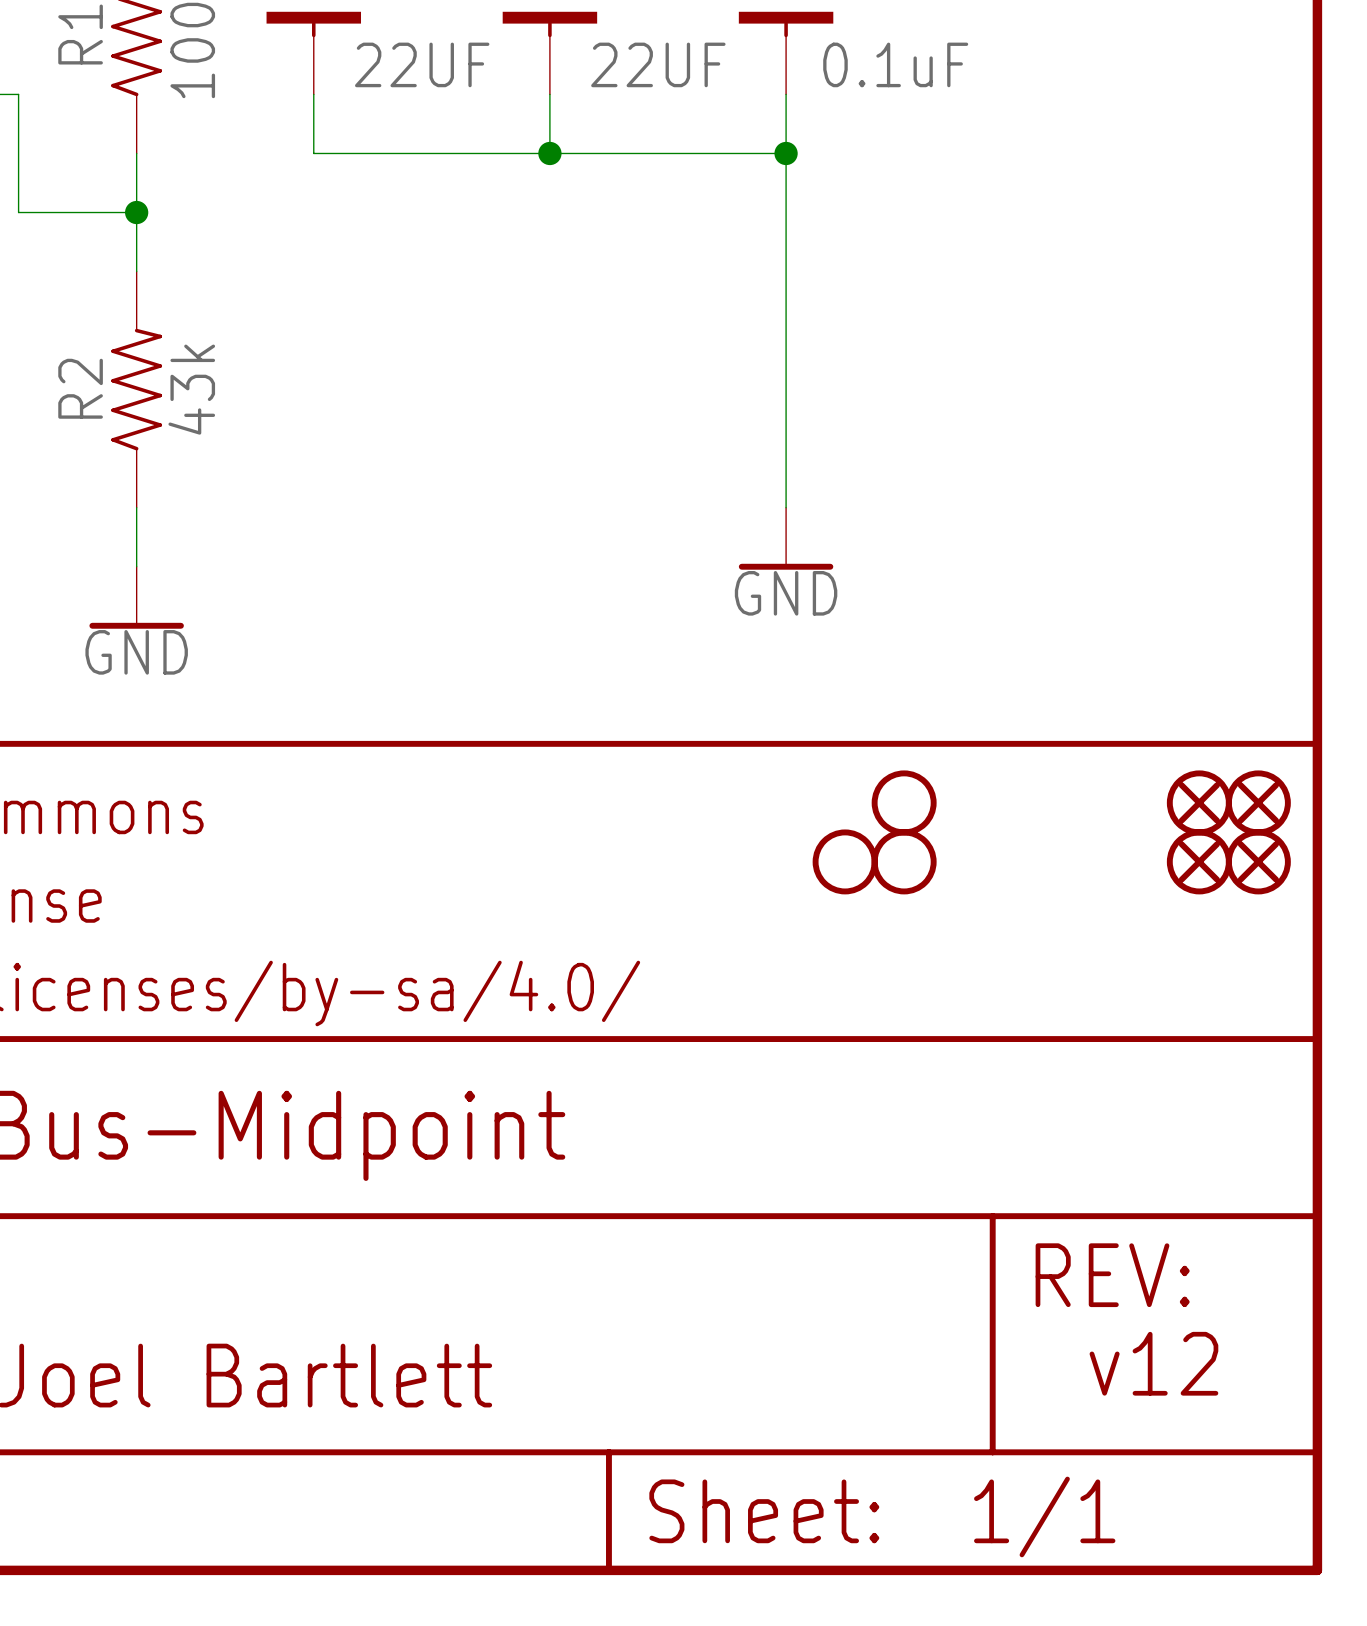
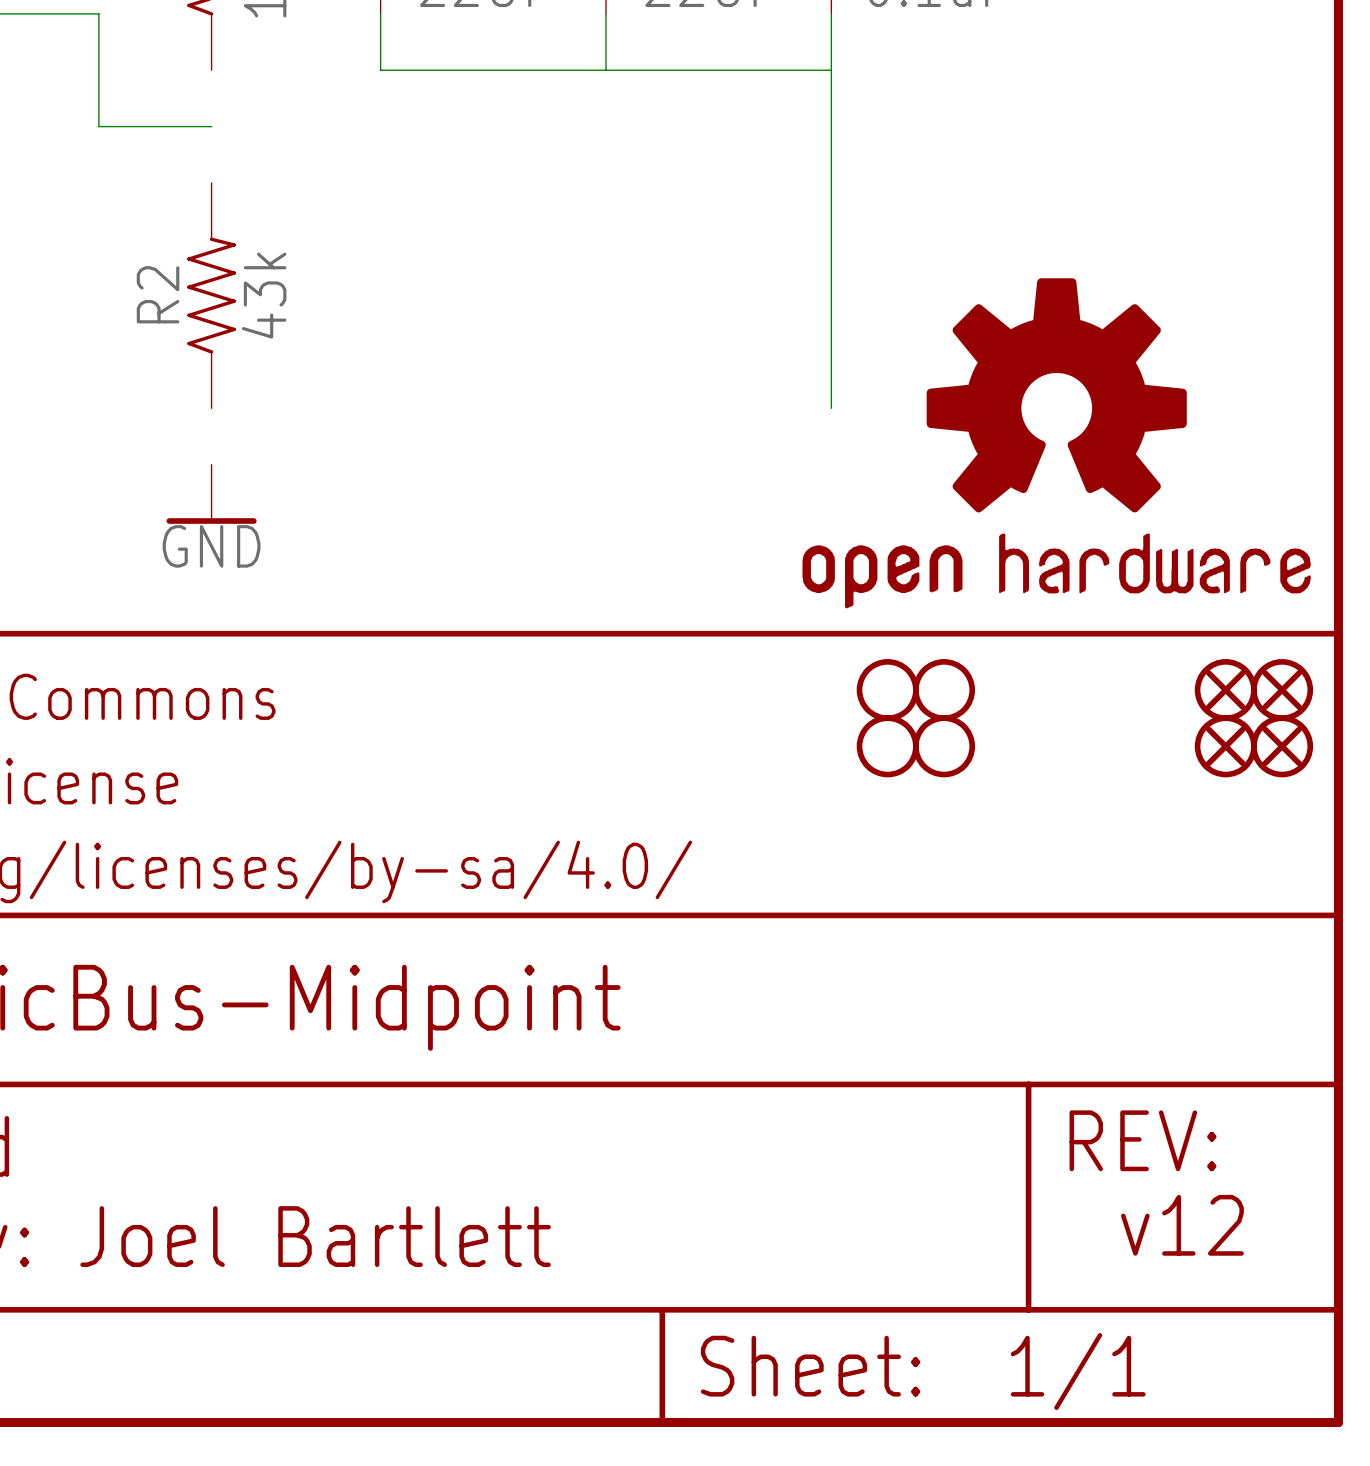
wire: (136, 153) (136, 271) -> none
junction: (549, 153) -> none
junction: (786, 153) -> none
junction: (136, 212) -> none
wire: (136, 507) (136, 566) -> none
power symbol: GND (786, 538) -> none
part: none -> (1056, 443)
part: none -> (887, 690)

